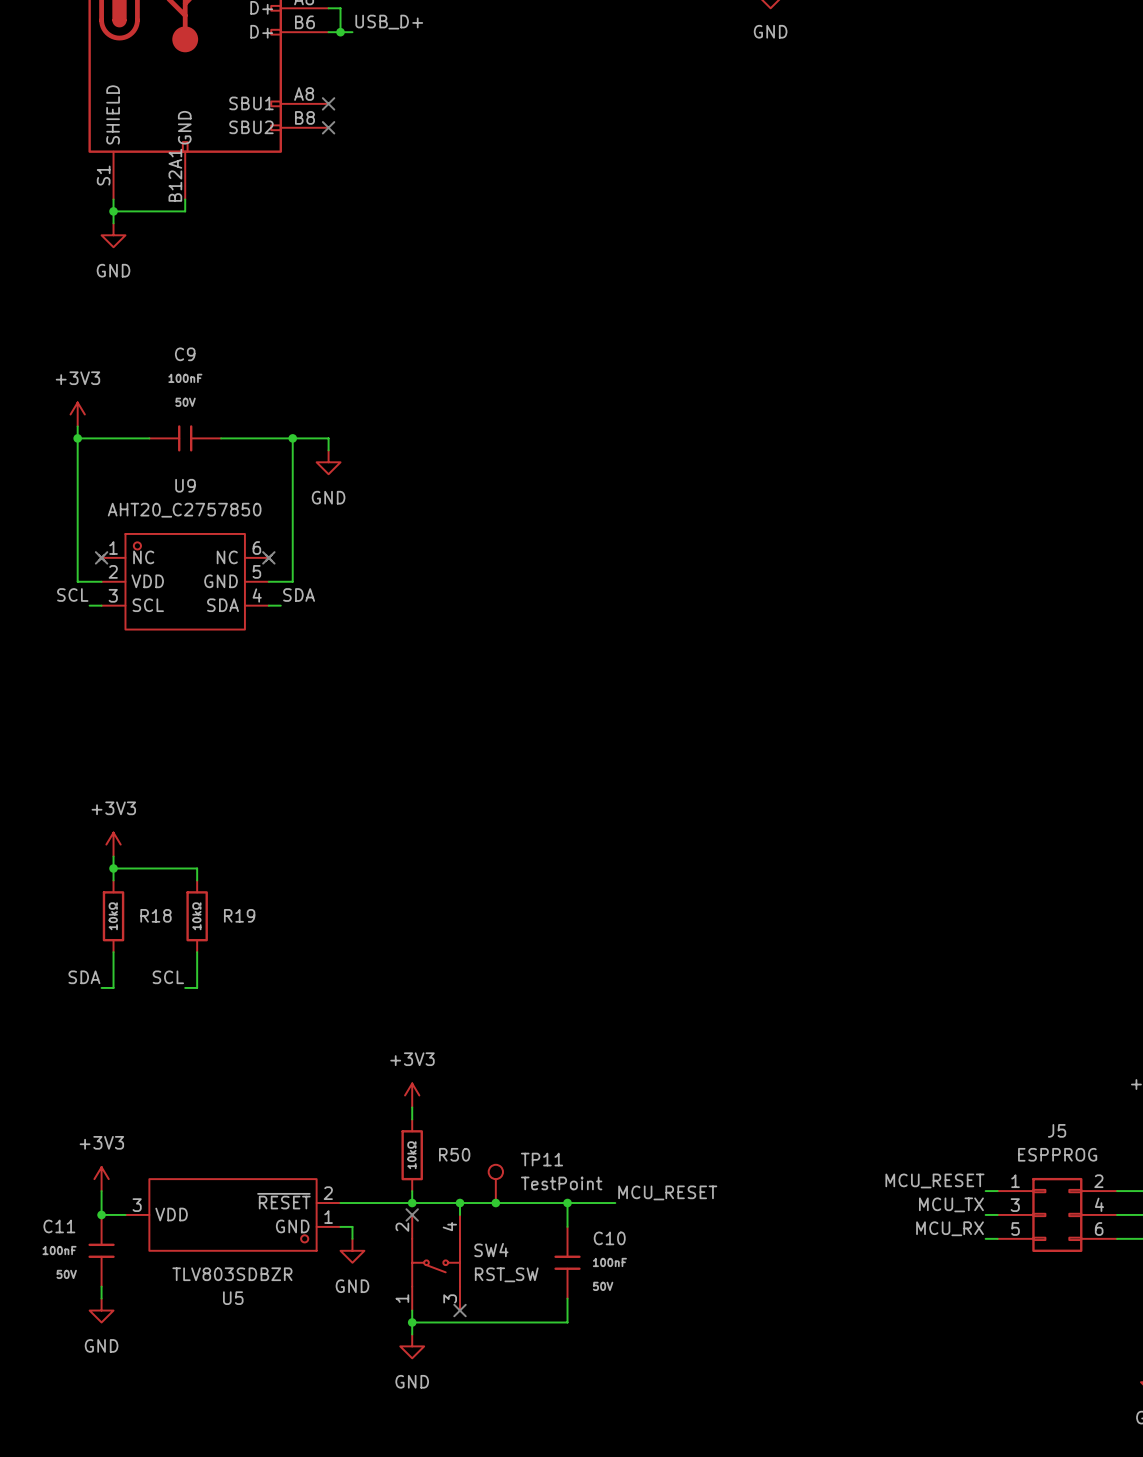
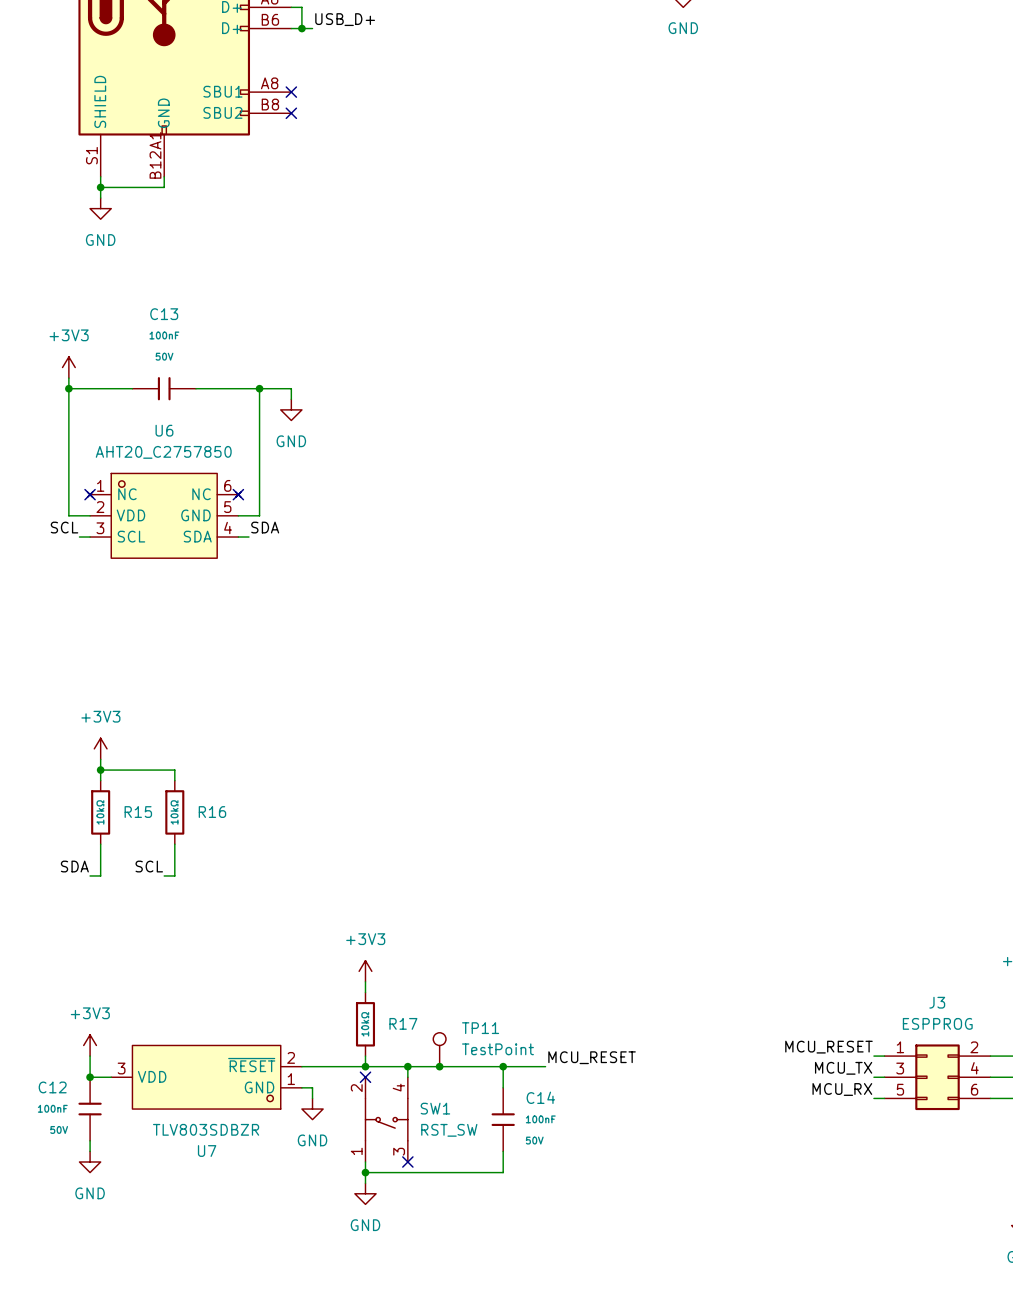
C9 name: C9 (185, 354) -> C13 (164, 314)
U9 name: U9 (185, 485) -> U6 (164, 430)
R18 name: R18 (156, 915) -> R15 (138, 812)
R19 name: R19 (239, 915) -> R16 (212, 812)
J5 name: J5 (1057, 1130) -> J3 (937, 1002)
R50 name: R50 (454, 1154) -> R17 (403, 1023)
C11 name: C11 (59, 1226) -> C12 (52, 1087)
C10 name: C10 (609, 1238) -> C14 (540, 1097)
SW4 name: SW4 (491, 1250) -> SW1 (435, 1108)
U5 name: U5 (233, 1298) -> U7 (207, 1151)

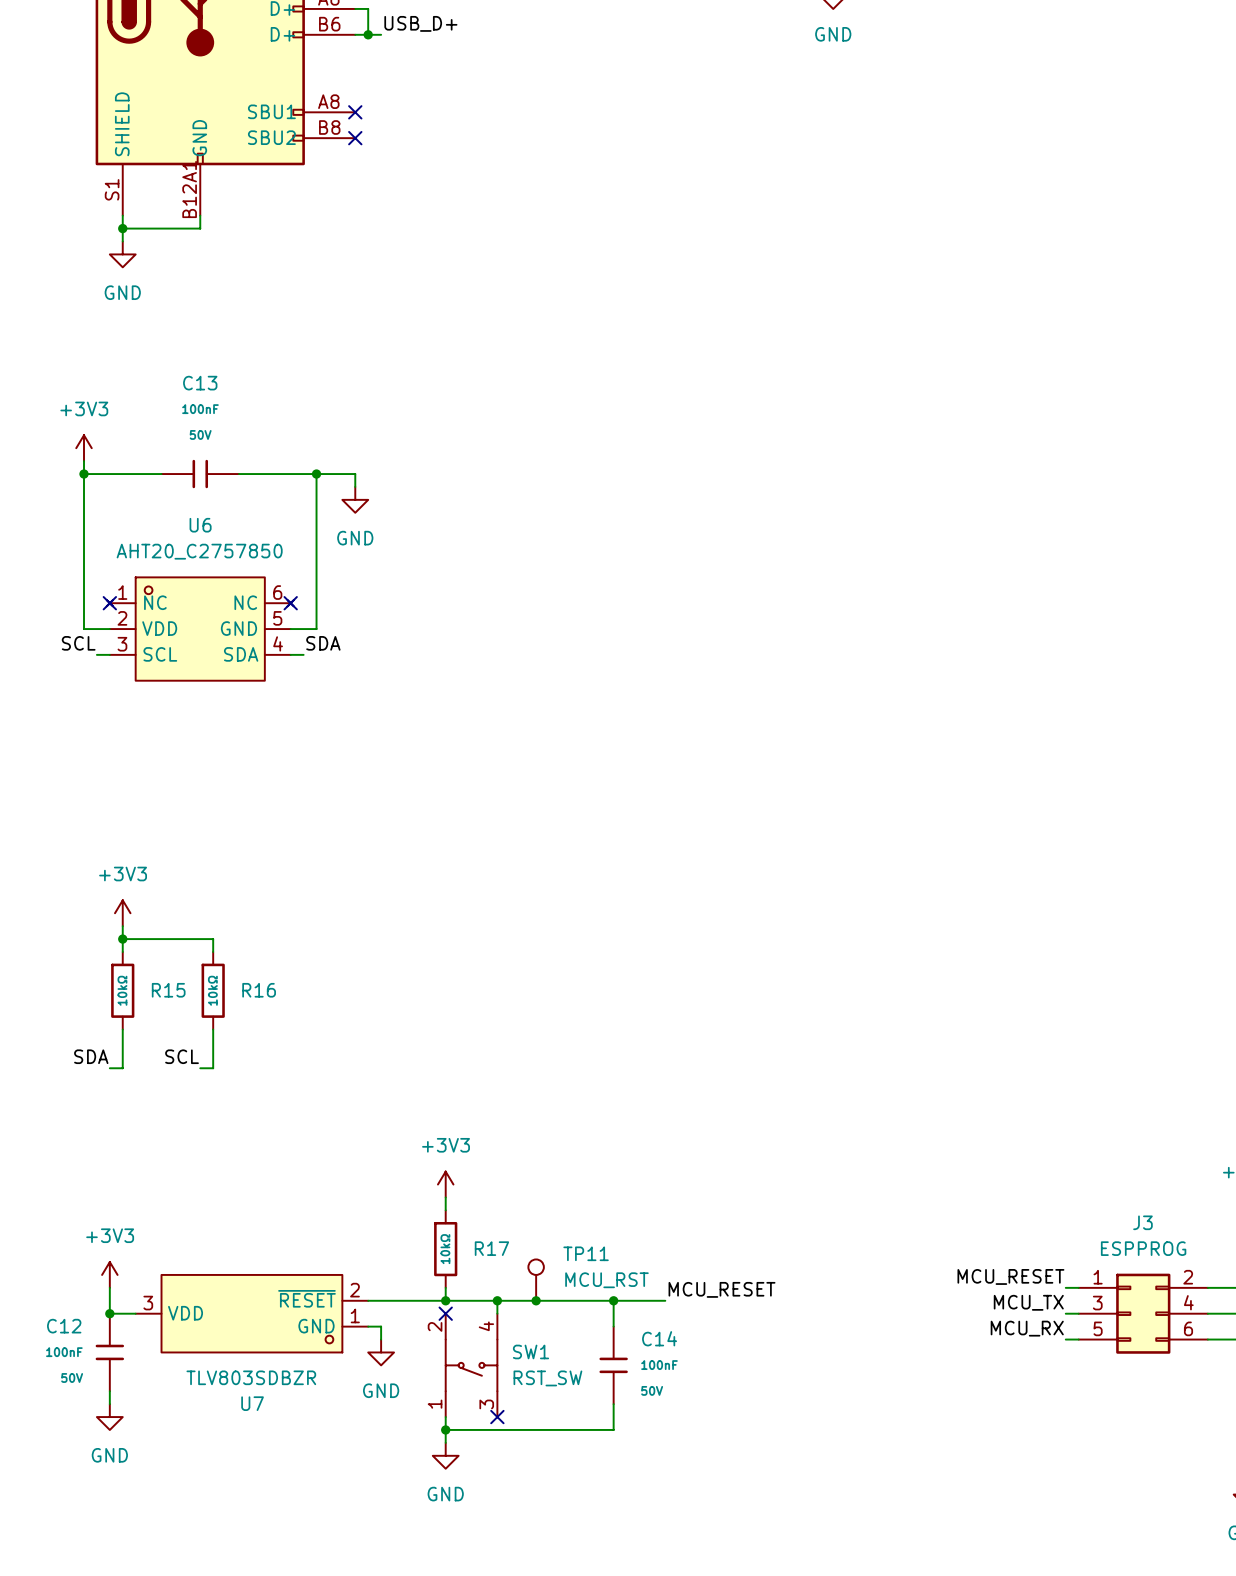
TP11 value: TestPoint (497, 1049) -> MCU_RST (606, 1280)

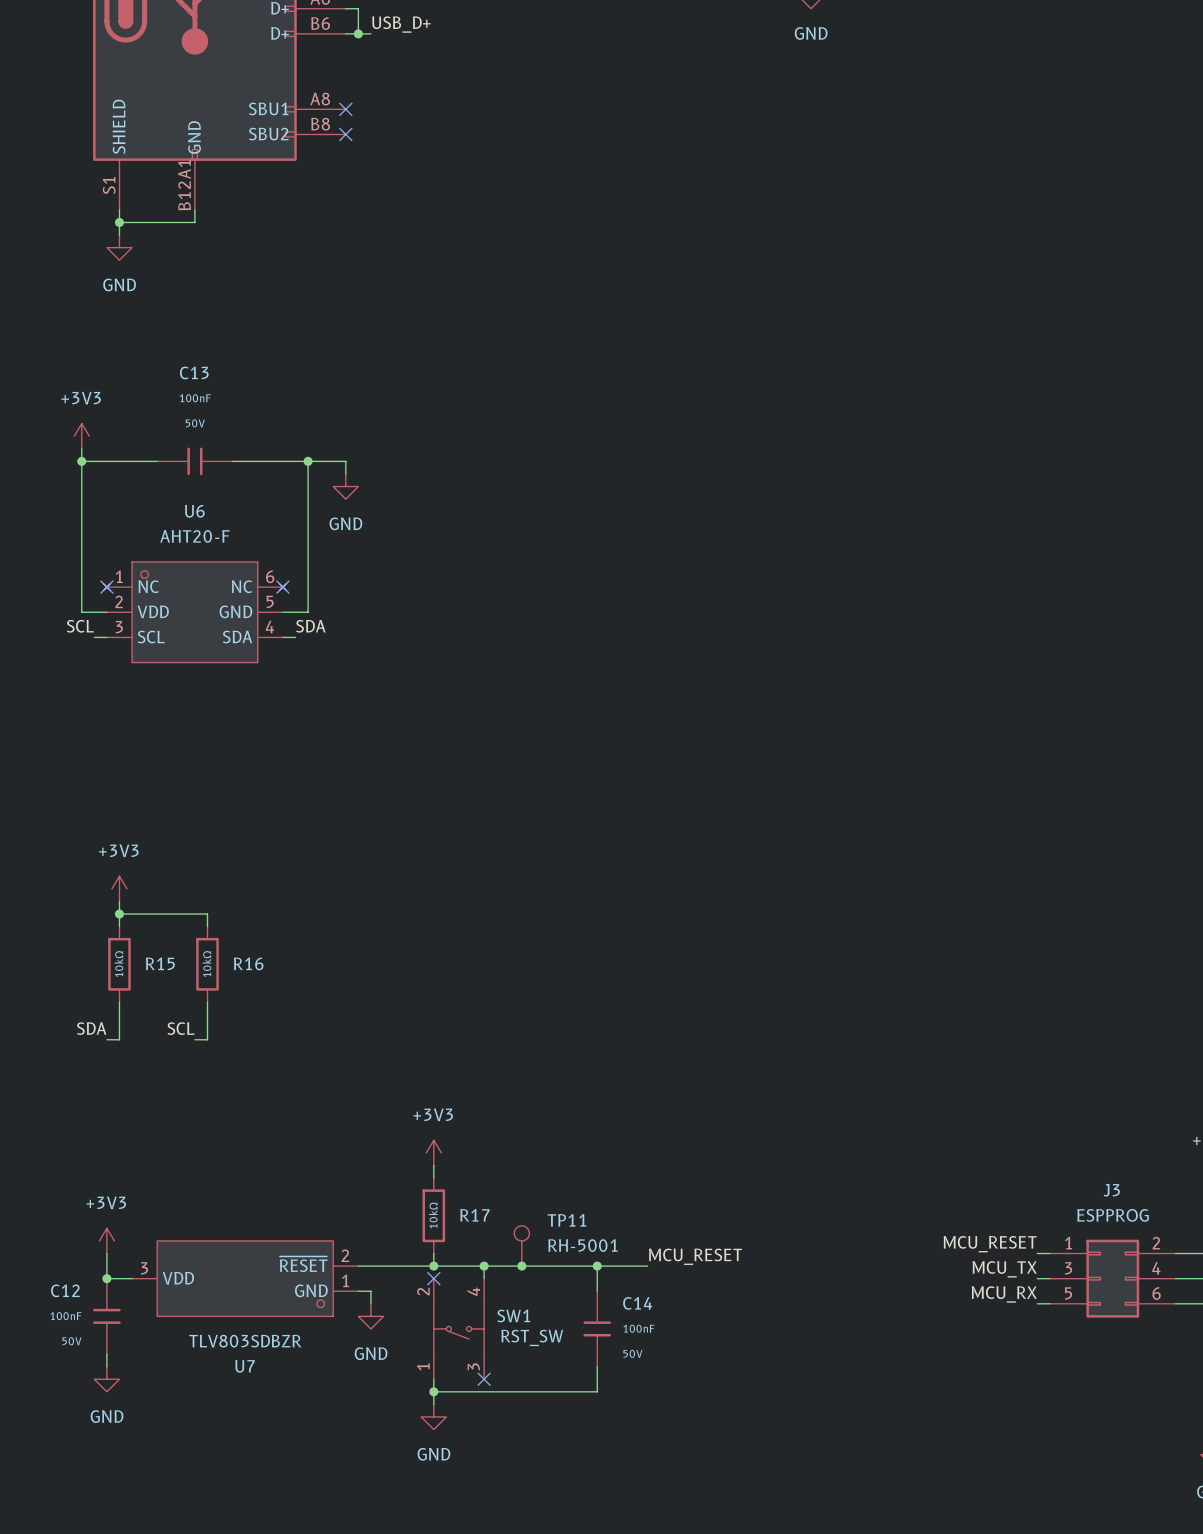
U6 value: AHT20_C2757850 (199, 551) -> AHT20-F (194, 536)
TP11 value: MCU_RST (606, 1280) -> RH-5001 (582, 1245)
SW1 text: none -> RST_SW (532, 1337)
SW1 value: RST_SW (547, 1378) -> none

